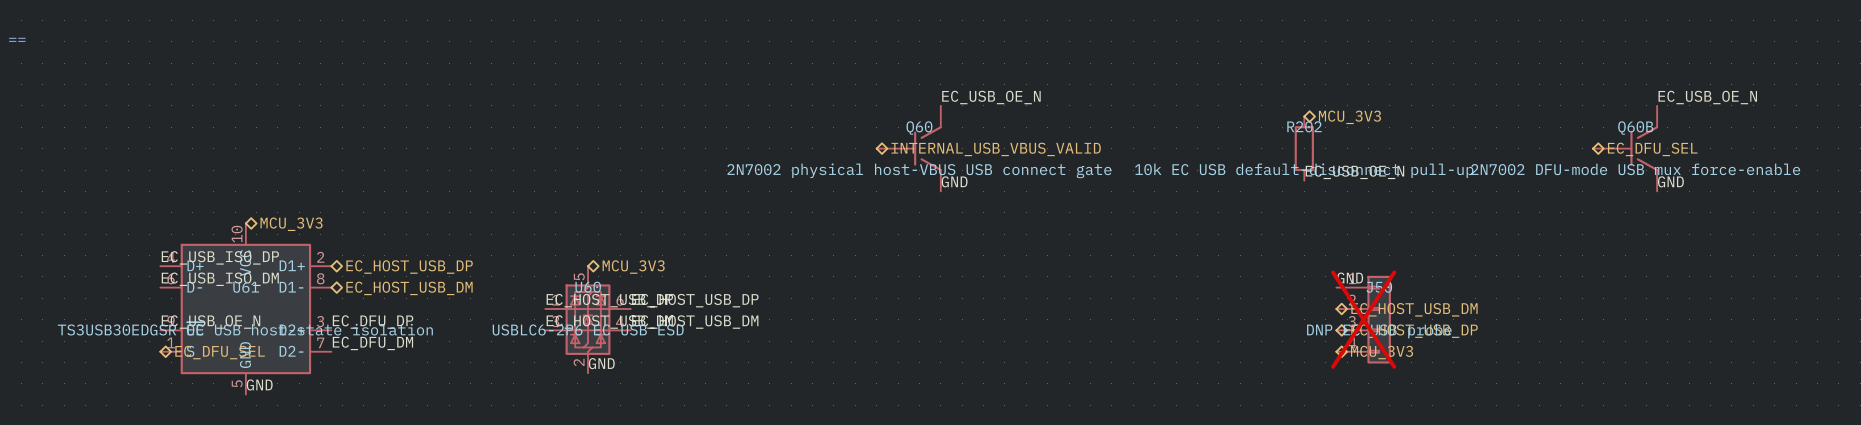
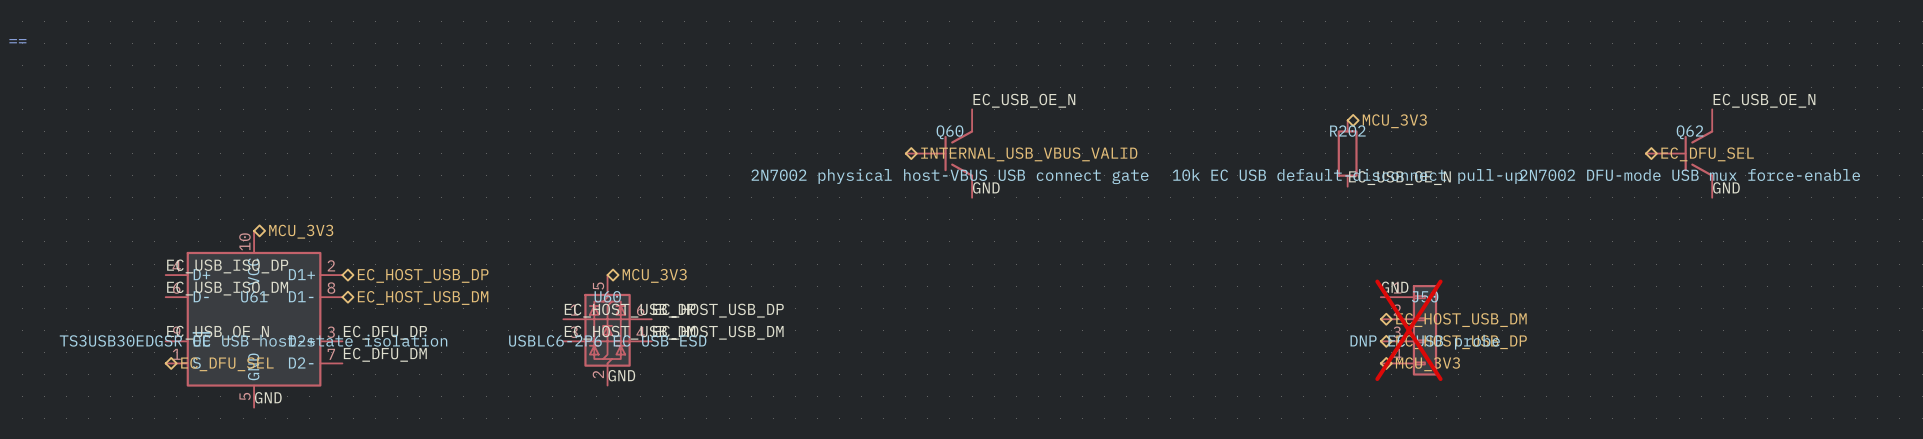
Q60B name: Q60B (1635, 128) -> Q62 (1690, 132)

